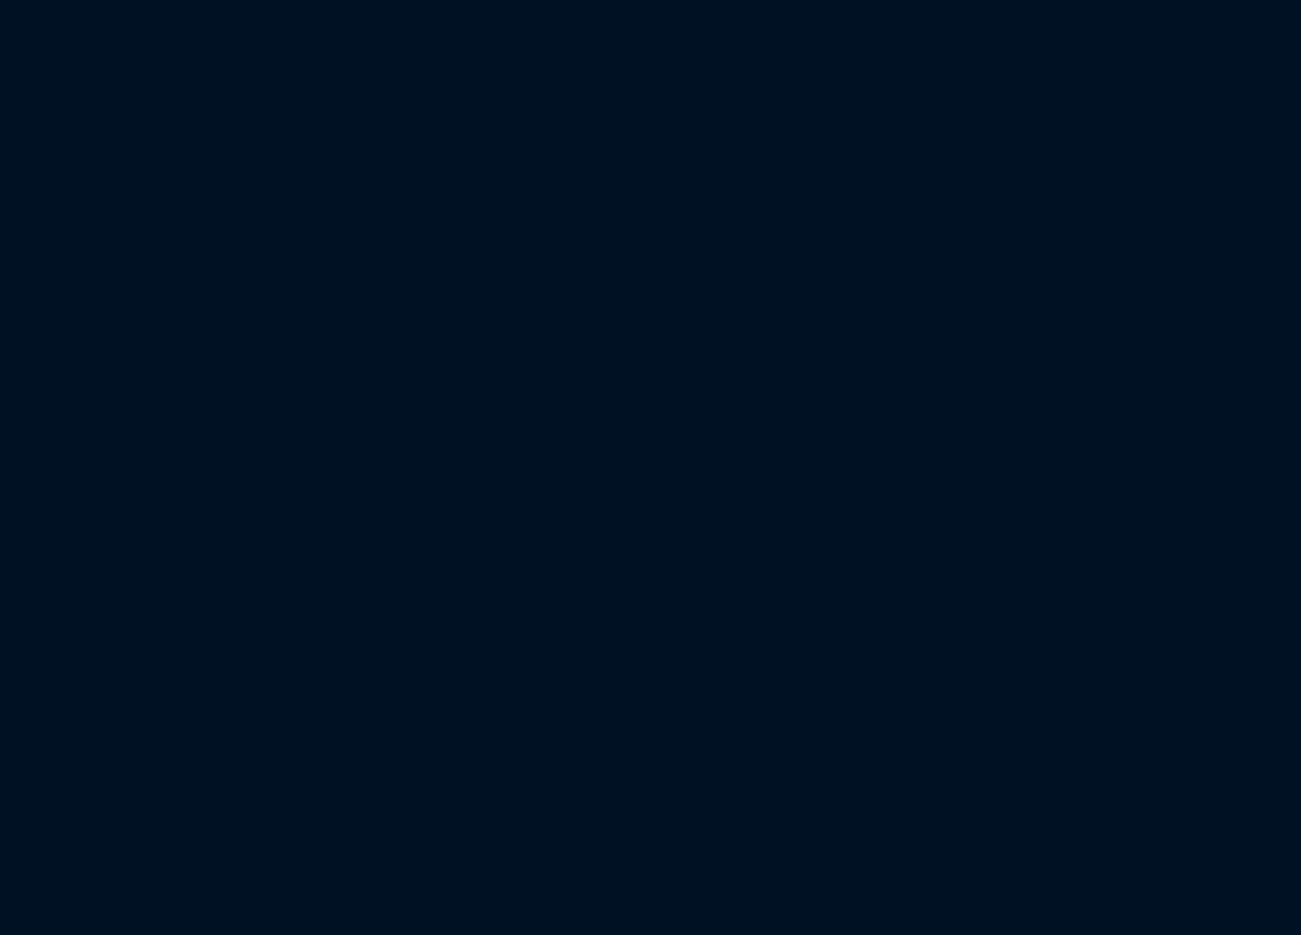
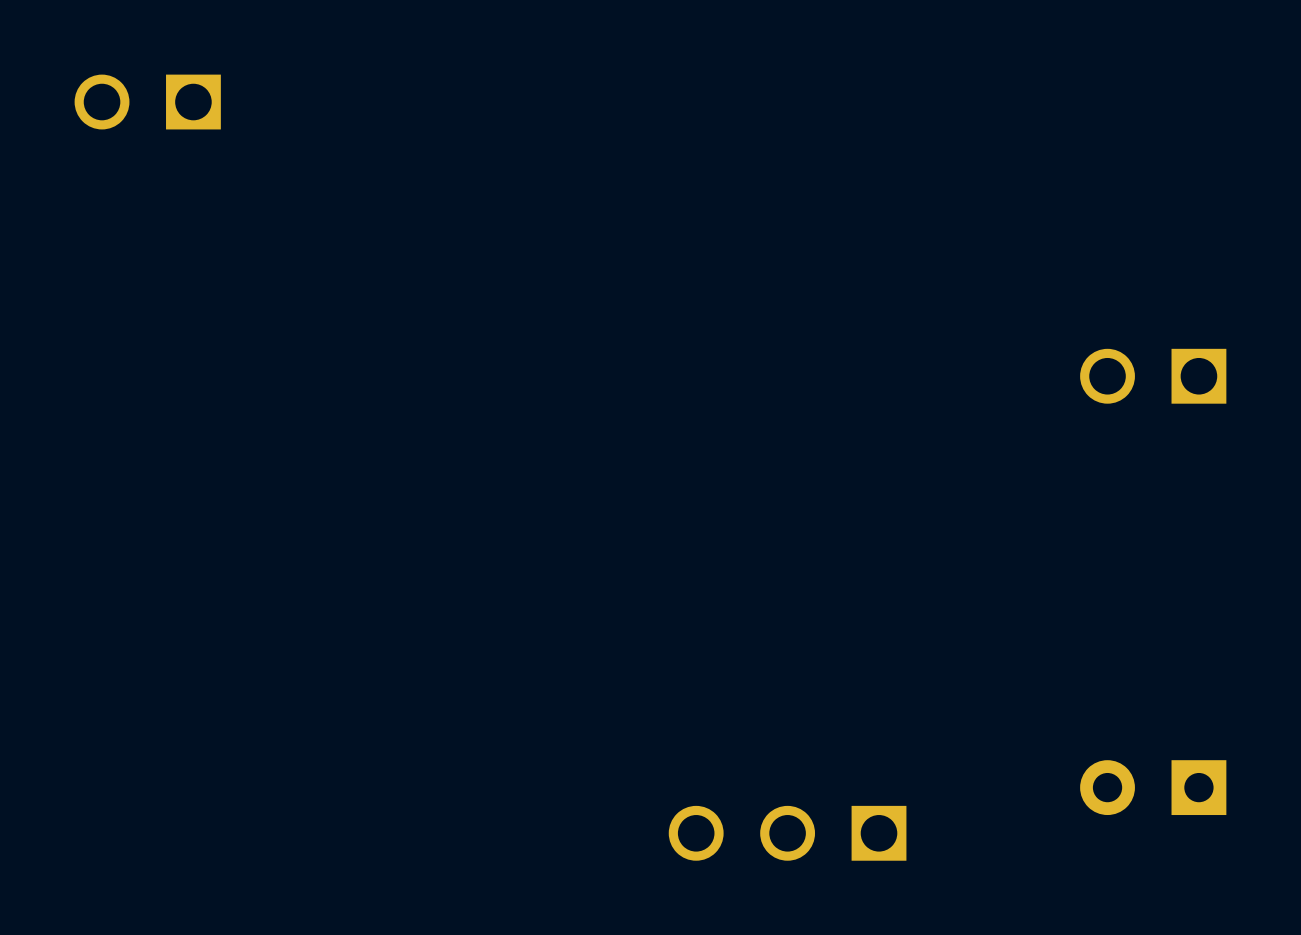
part: none -> (147, 102)
part: none -> (1153, 376)
part: none -> (1153, 787)
part: none -> (787, 833)

